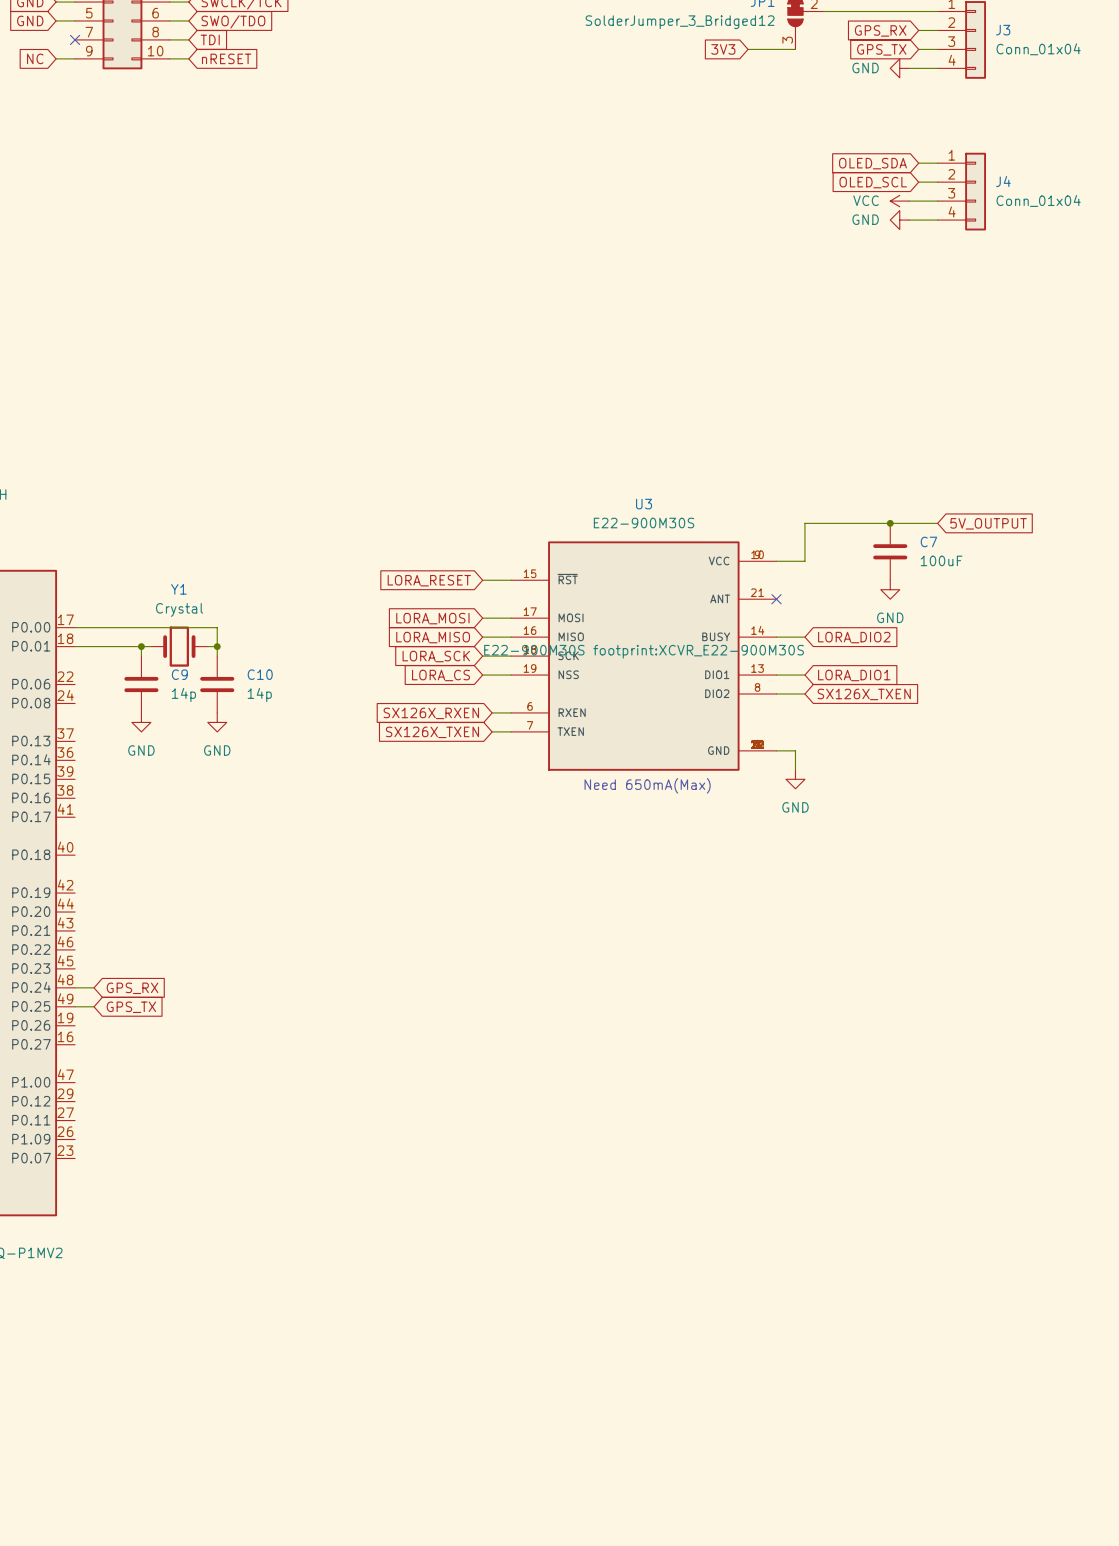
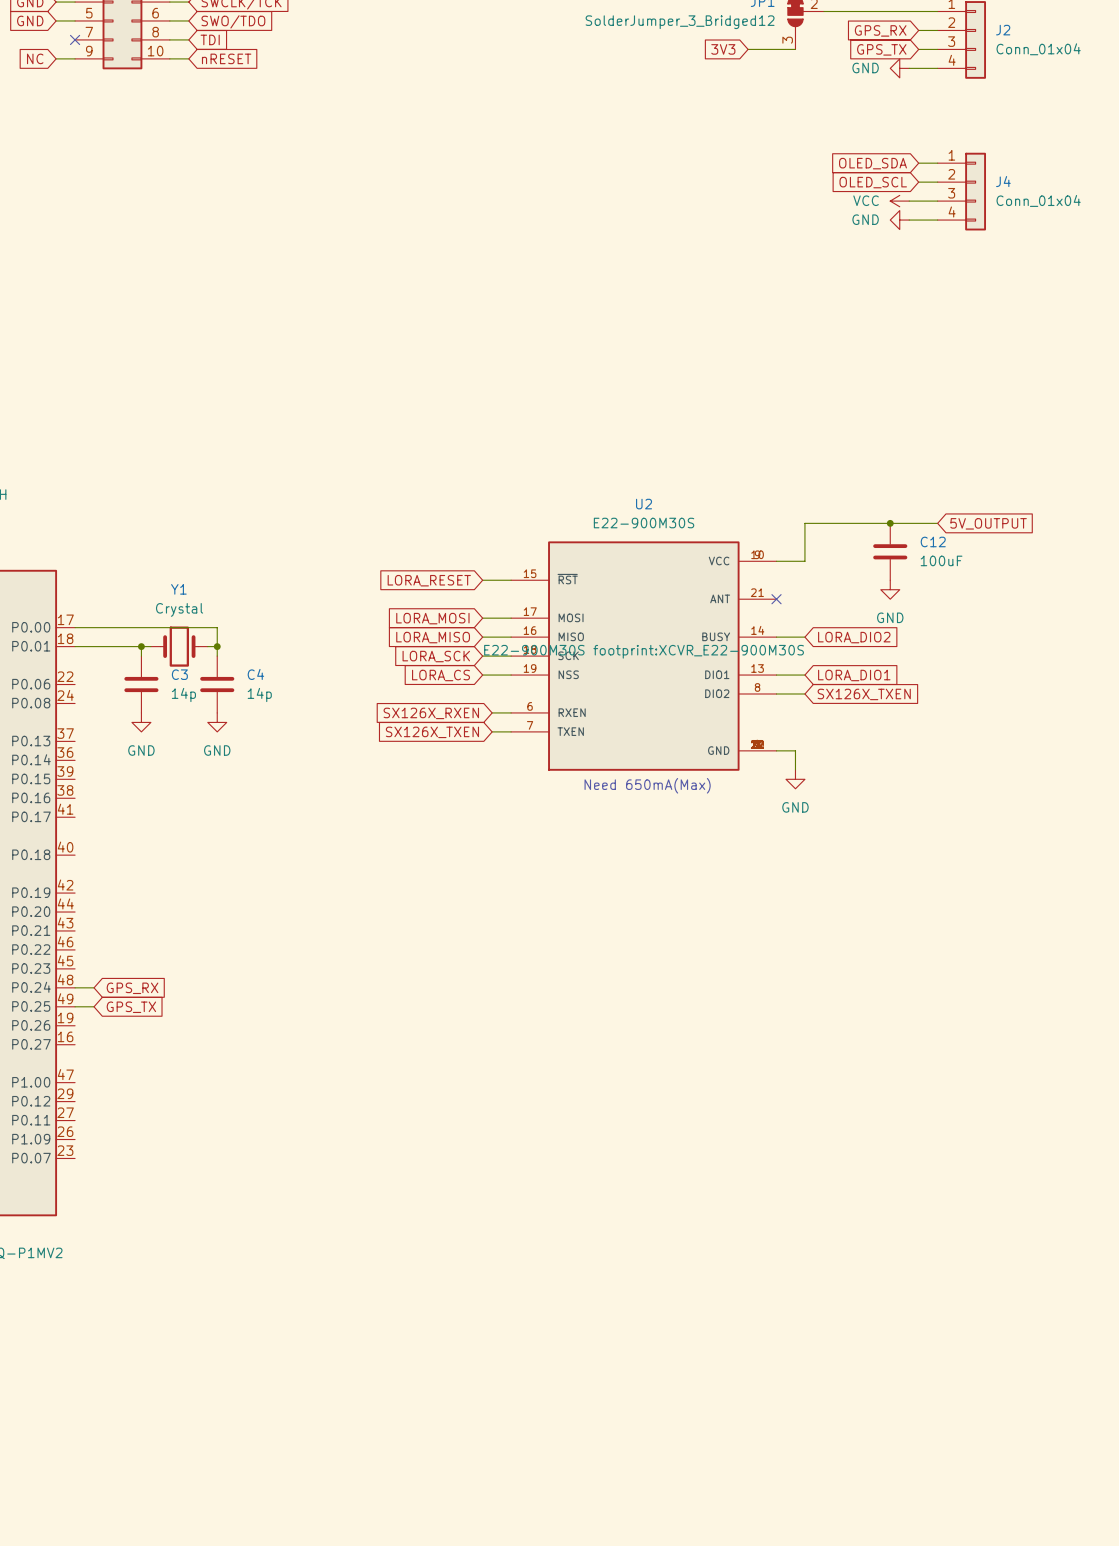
J3 name: J3 (1003, 30) -> J2 (1003, 30)
U3 name: U3 (644, 504) -> U2 (644, 504)
C7 name: C7 (928, 541) -> C12 (933, 541)
C9 name: C9 (179, 674) -> C3 (179, 674)
C10 name: C10 (260, 674) -> C4 (255, 674)

